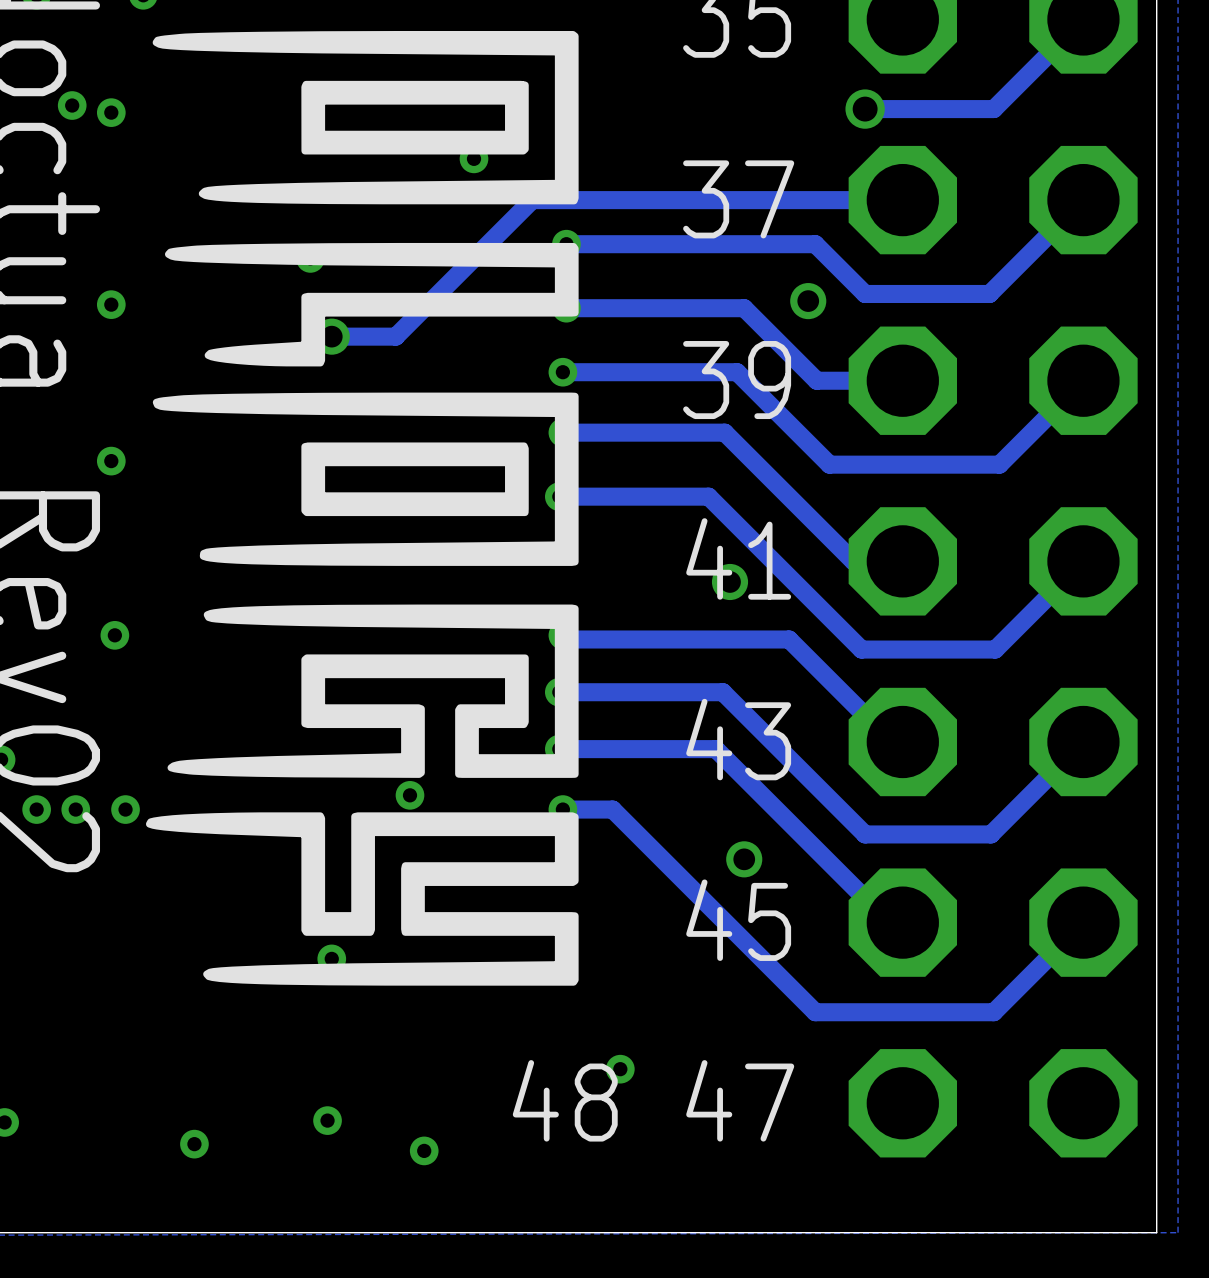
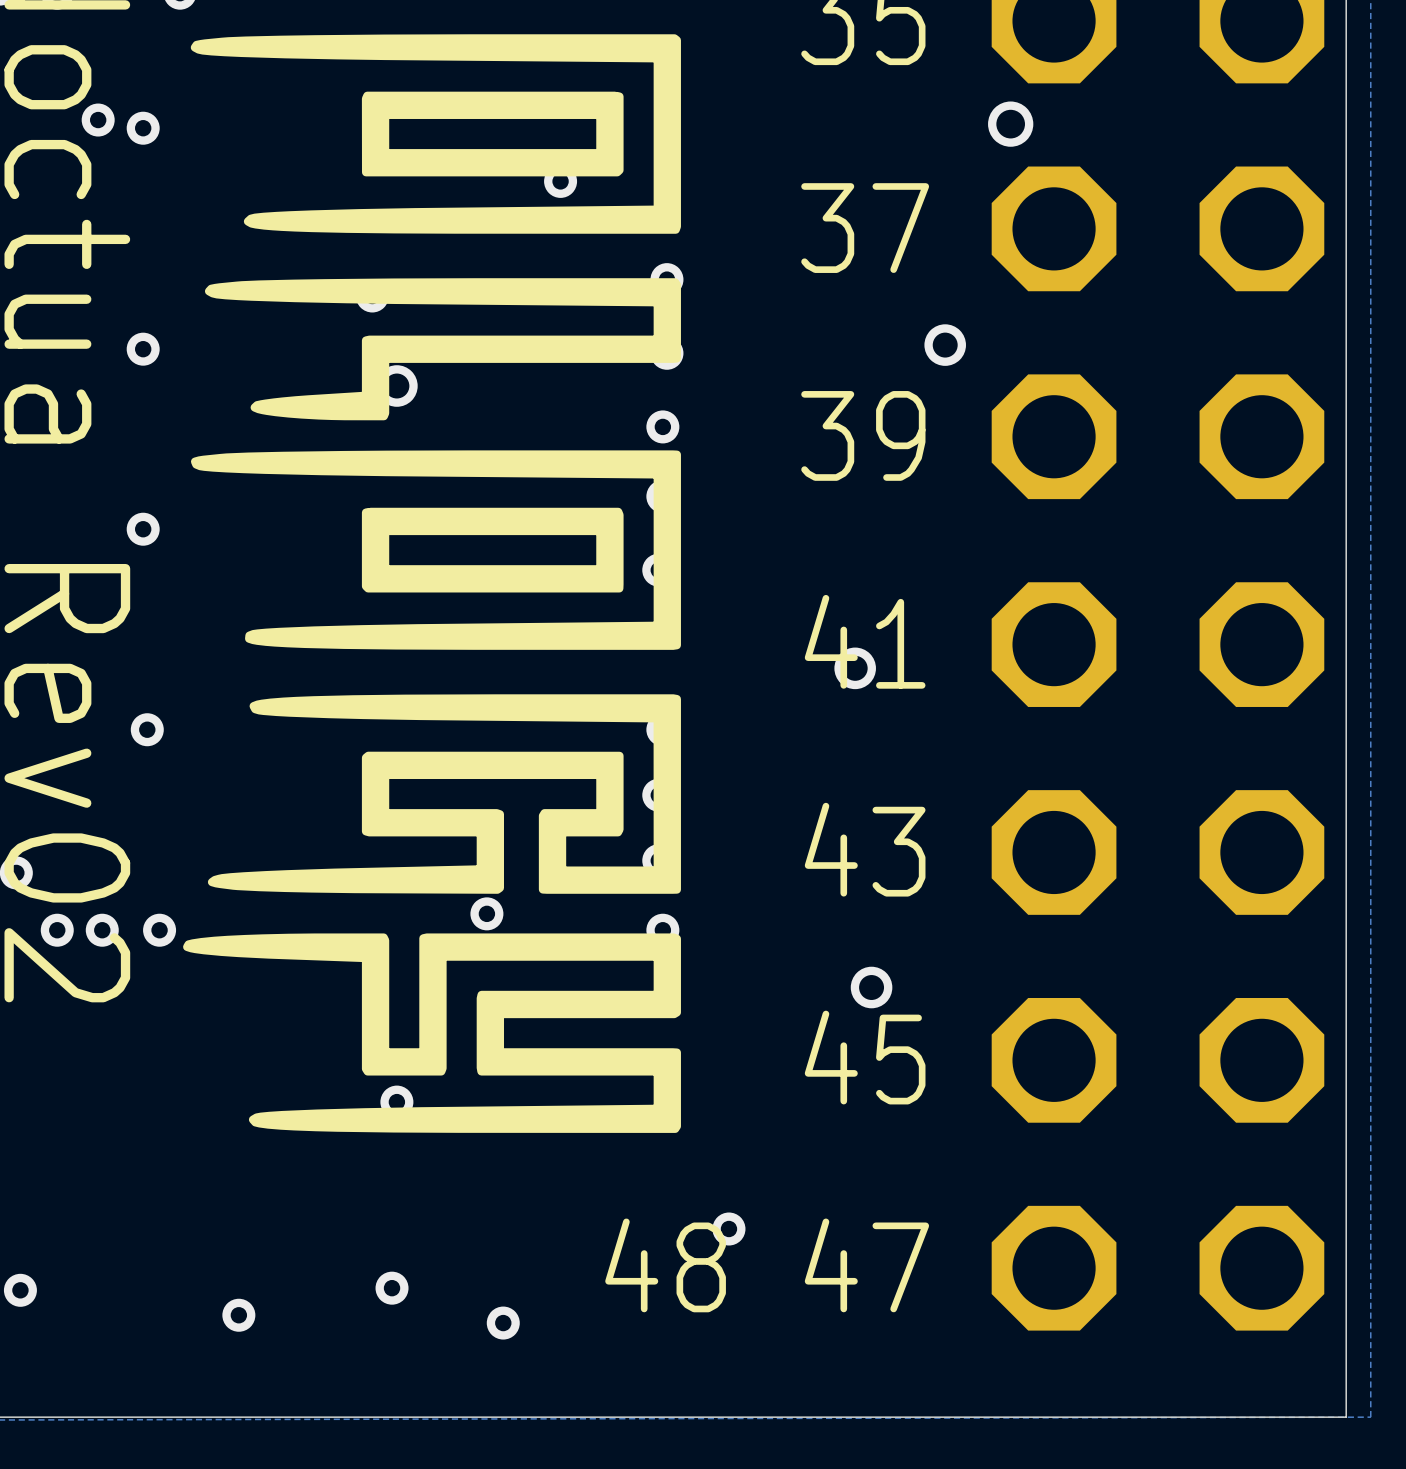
track: (1083, 19) (993, 109) (865, 109) -> none
track: (902, 200) (532, 200) (395, 336) (331, 336) -> none
track: (1083, 200) (989, 293) (865, 293) (815, 244) (566, 244) -> none
track: (566, 308) (744, 308) (816, 380) (902, 380) -> none
track: (562, 372) (737, 372) (829, 464) (999, 464) (1083, 380) -> none
track: (562, 432) (724, 432) (853, 561) (902, 561) -> none
track: (559, 496) (708, 496) (861, 649) (995, 649) (1083, 561) -> none
track: (562, 635) (567, 639) (789, 639) (891, 742) -> none
track: (559, 692) (722, 692) (865, 834) (991, 834) (1083, 742) -> none
track: (559, 749) (715, 749) (889, 922) -> none
track: (562, 809) (612, 809) (815, 1012) (993, 1012) (1083, 922) -> none

